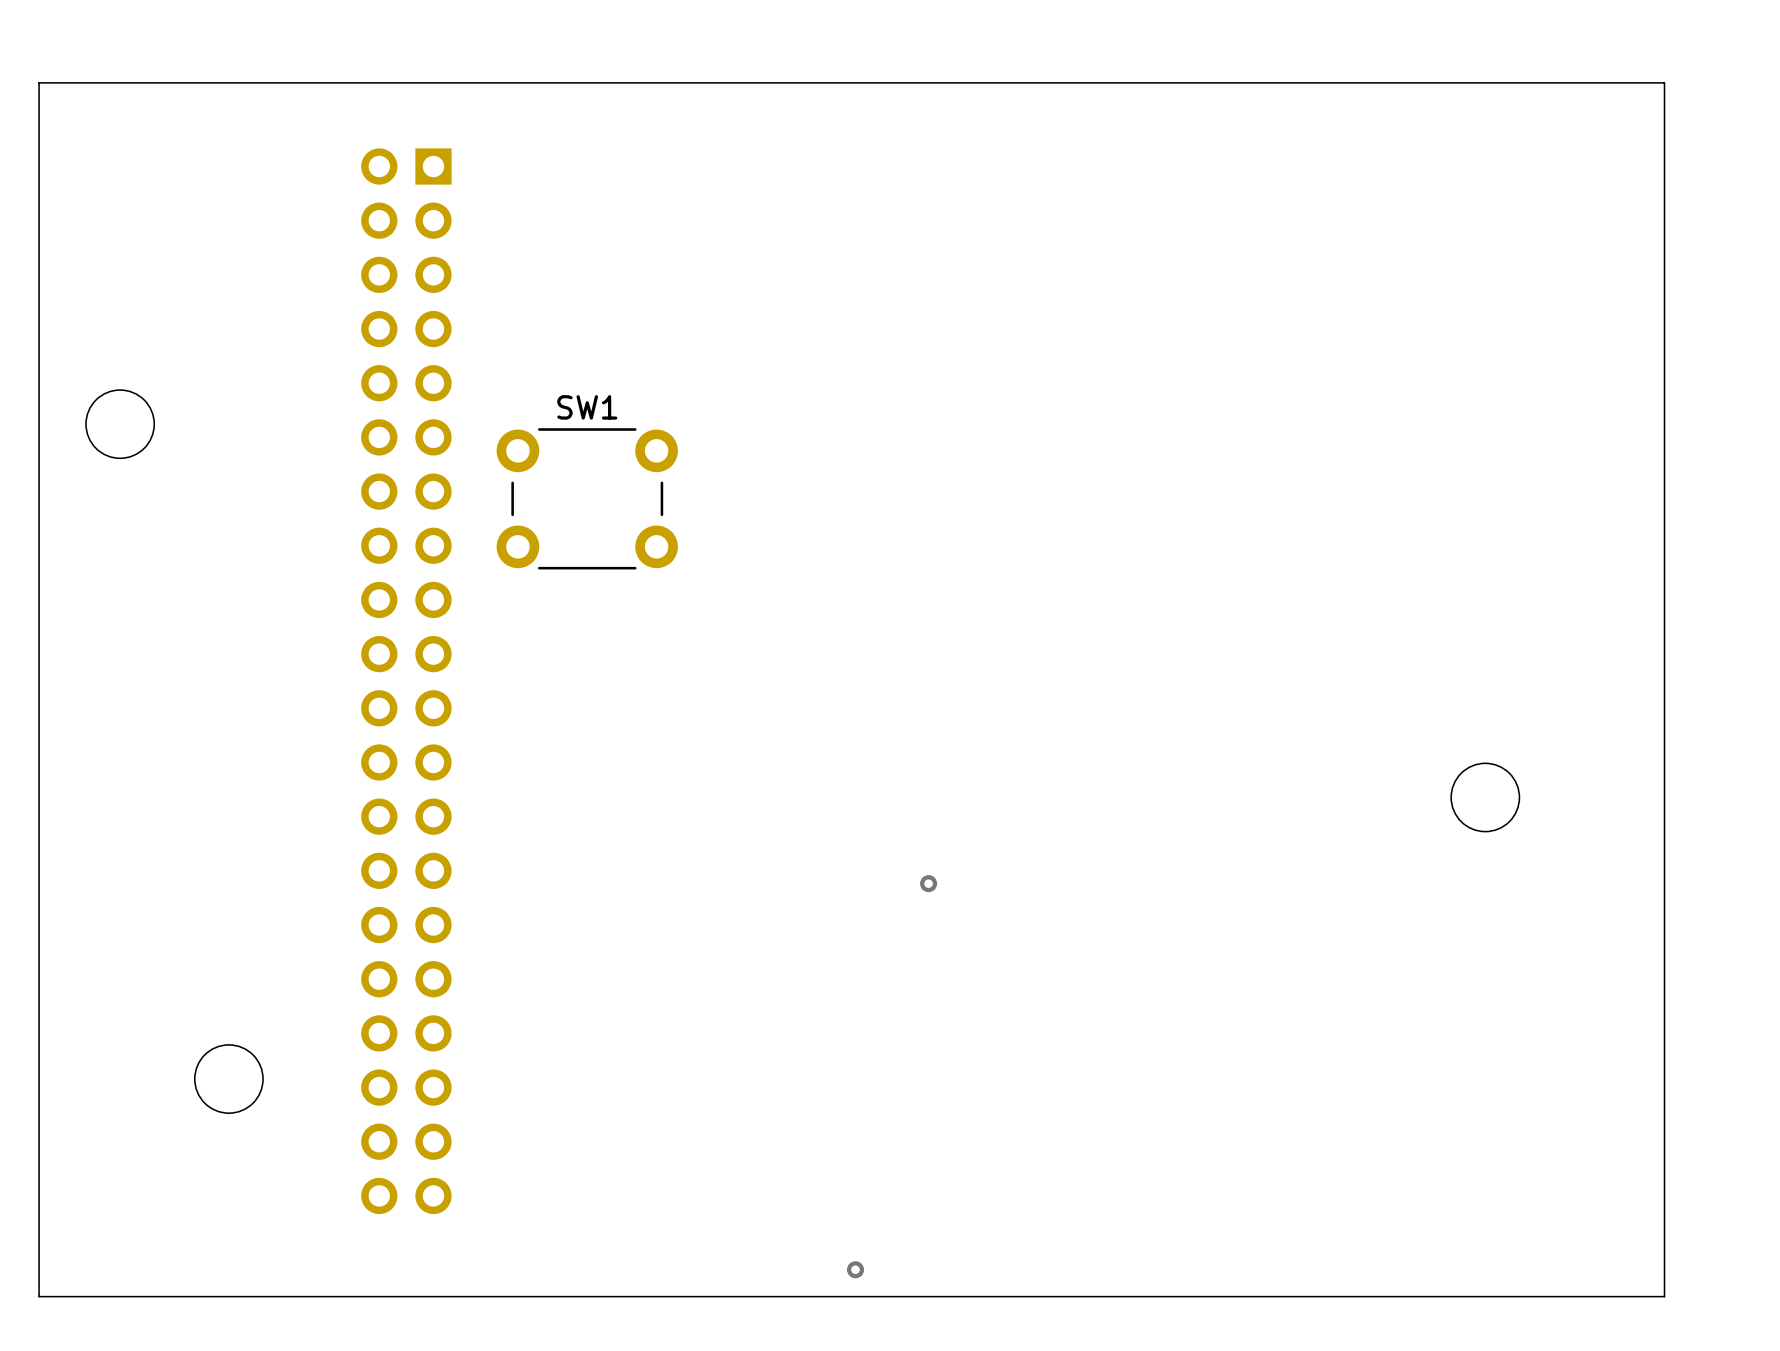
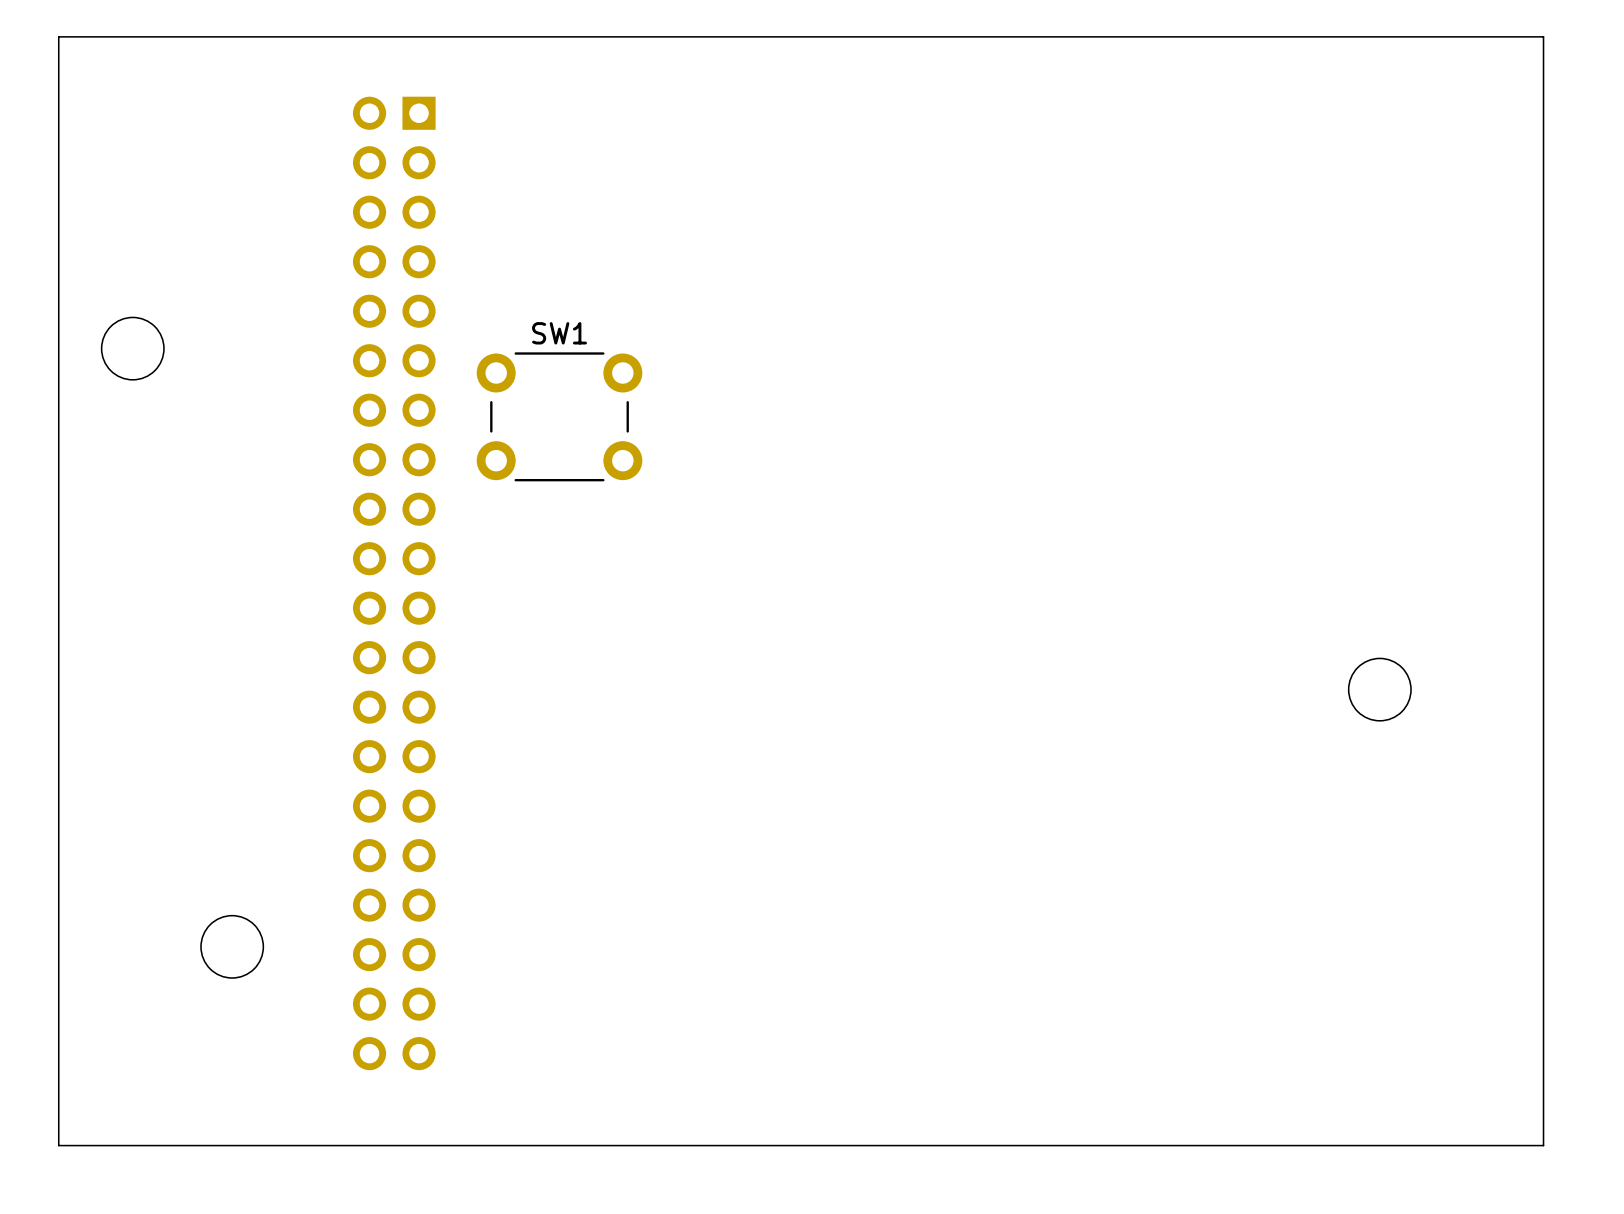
via: (928, 883) -> none
via: (855, 1269) -> none

